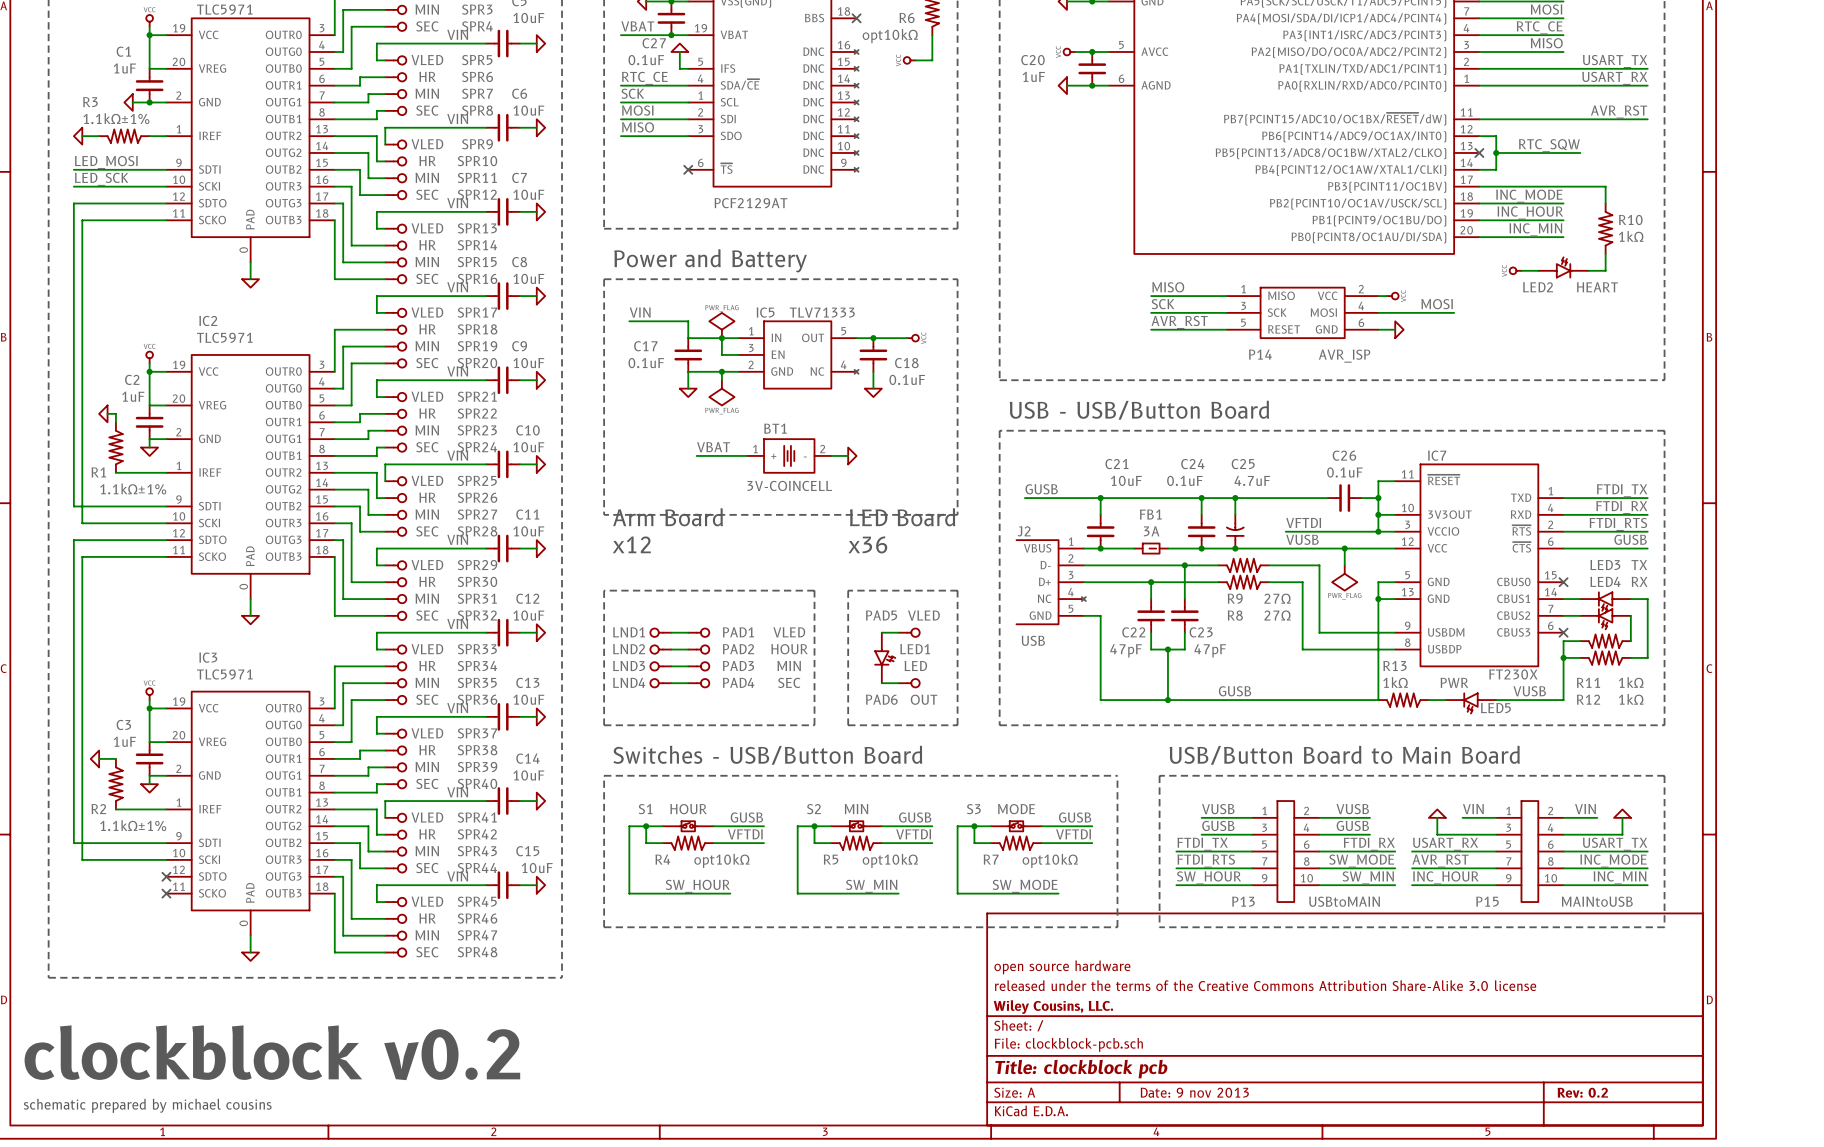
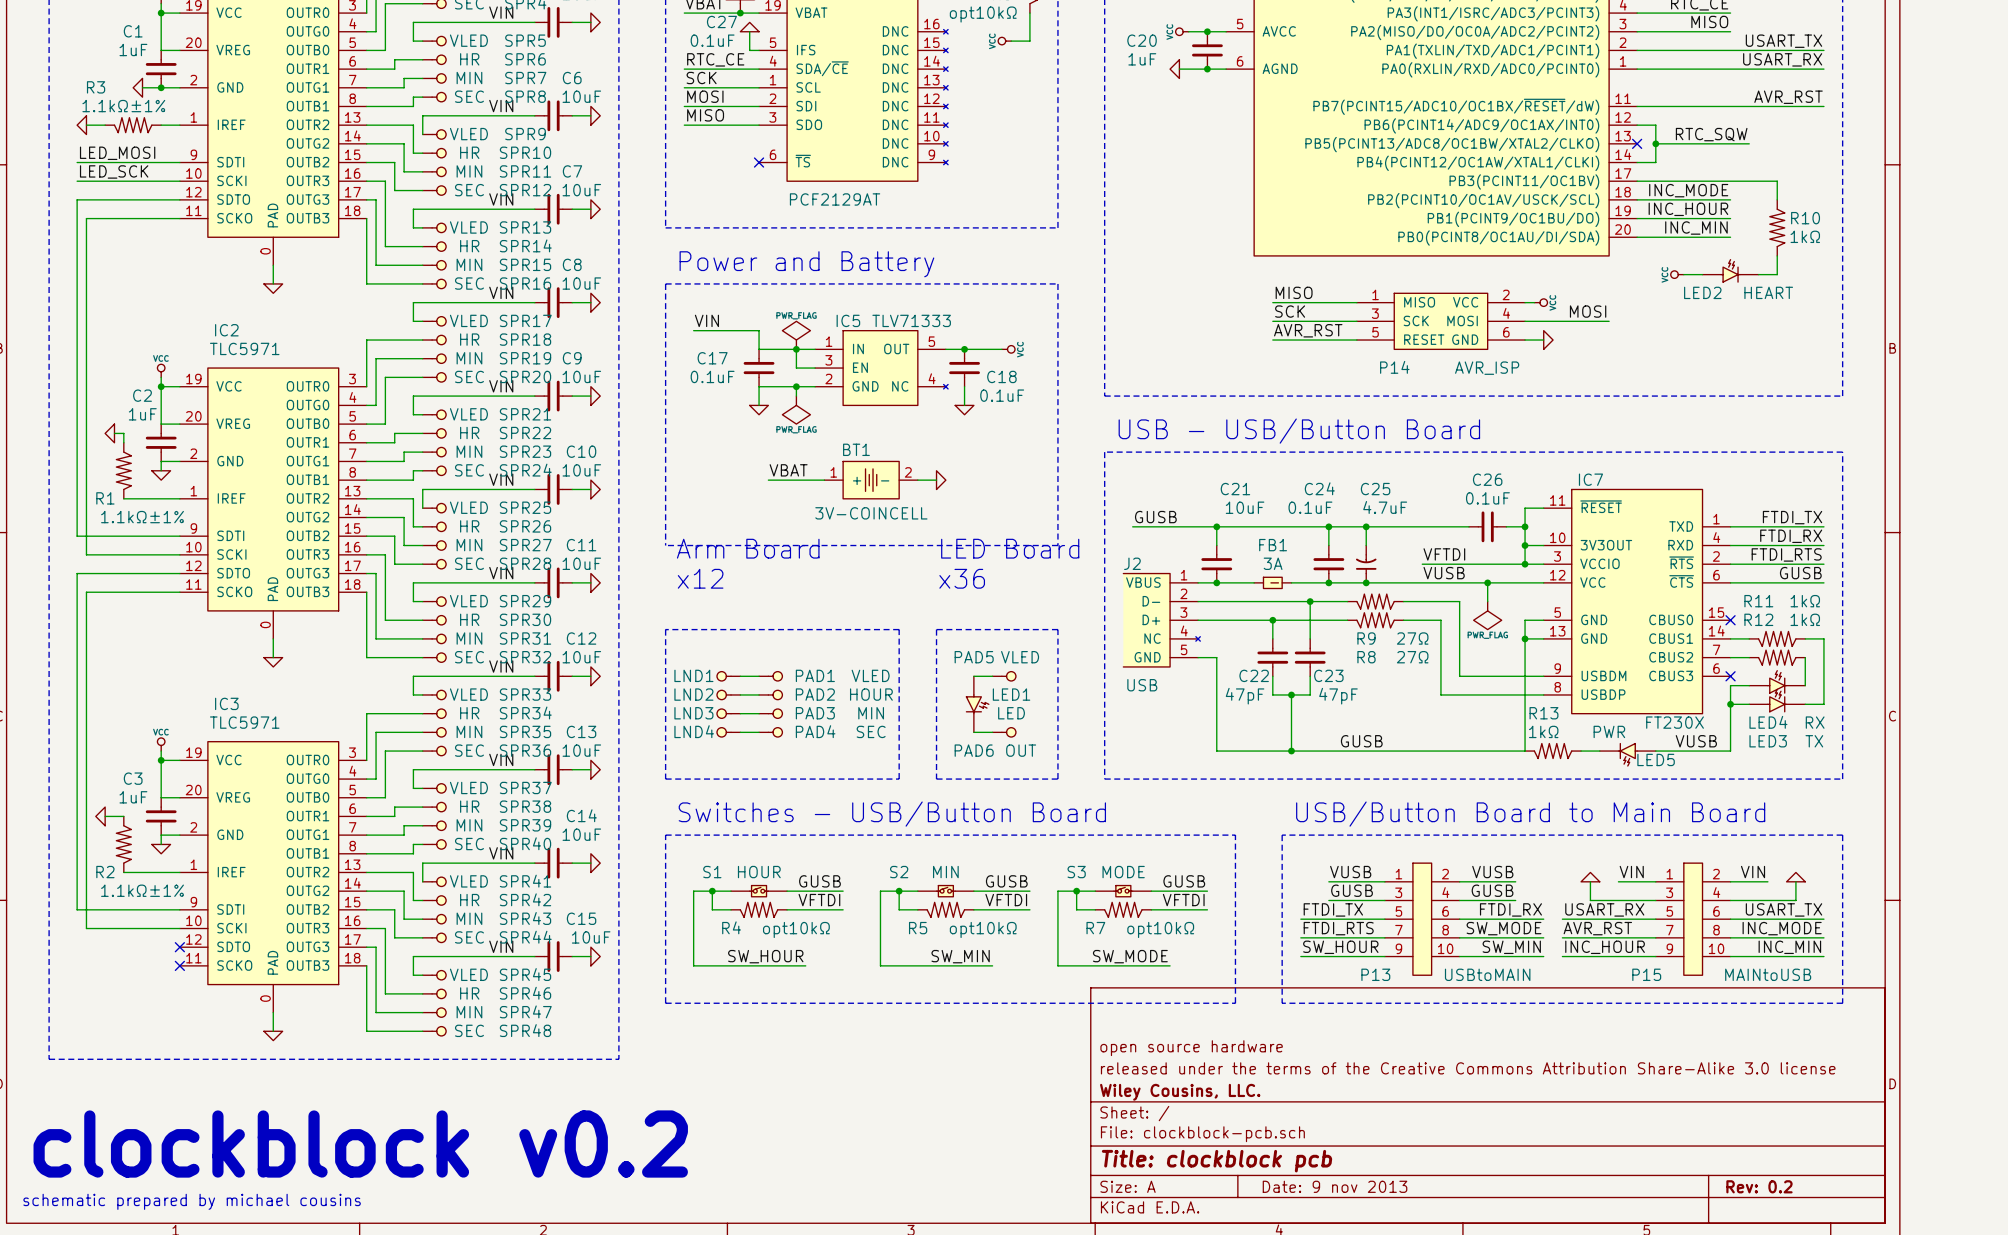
LED3 value position: TX (1639, 565) -> TX (1814, 741)
LED4 value position: RX (1639, 581) -> RX (1815, 722)
LED3 rotation: 0° (1605, 602) -> 180° (1777, 700)
LED3 position: (1605, 602) -> (1777, 700)
LED4 rotation: 0° (1605, 619) -> 180° (1777, 681)
R11 position: (1605, 641) -> (1777, 638)
R12 position: (1605, 657) -> (1777, 657)
R11 name position: R11 (1588, 682) -> R11 (1758, 601)
R11 value position: 1kΩ (1631, 682) -> 1kΩ (1805, 601)
R12 name position: R12 (1588, 699) -> R12 (1758, 619)
R12 value position: 1kΩ (1631, 699) -> 1kΩ (1805, 619)

